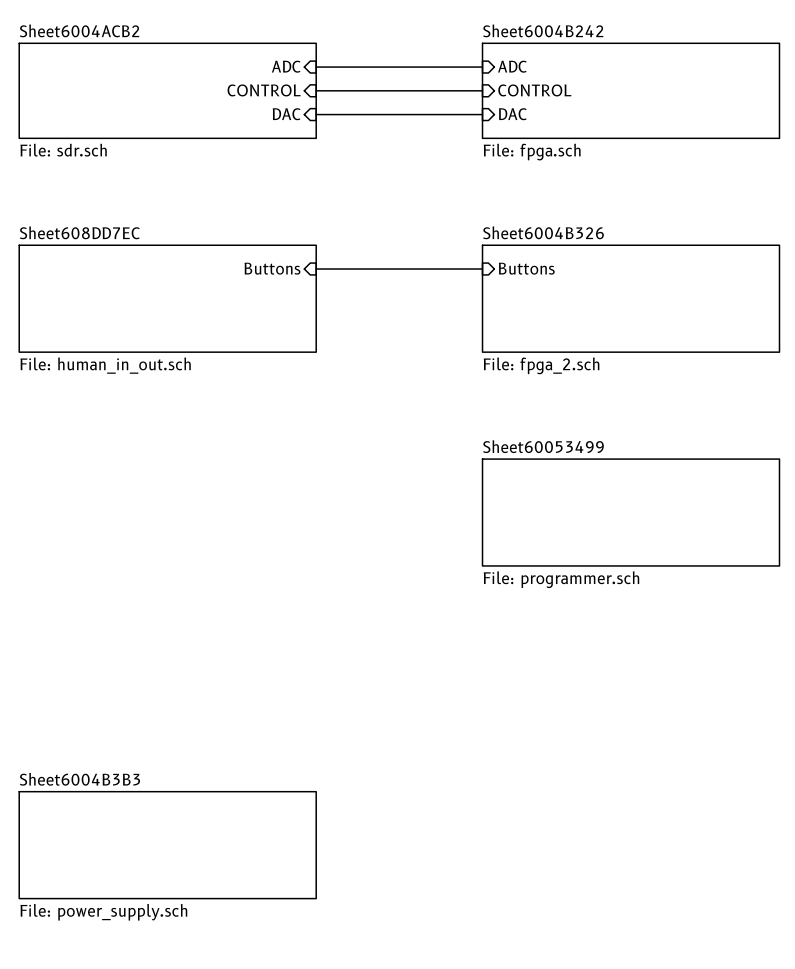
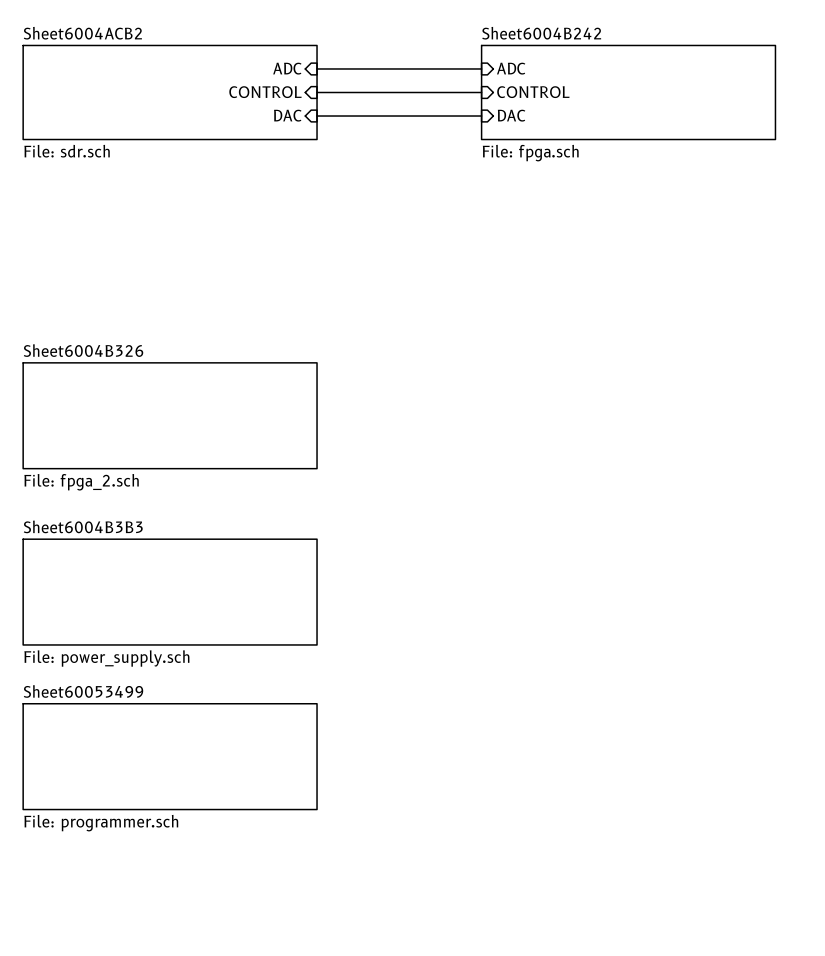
sheet pin: Buttons (272, 268) -> none
sheet pin: Buttons (526, 268) -> none
bus: (316, 269) (482, 269) -> none
sheet Sheet608DD7EC: File: human_in_out.sch (167, 298) -> none
sheet Sheet6004B326 position: (631, 298) -> (170, 415)
sheet Sheet60053499 position: (631, 512) -> (170, 756)
sheet Sheet6004B3B3 position: (167, 845) -> (170, 592)

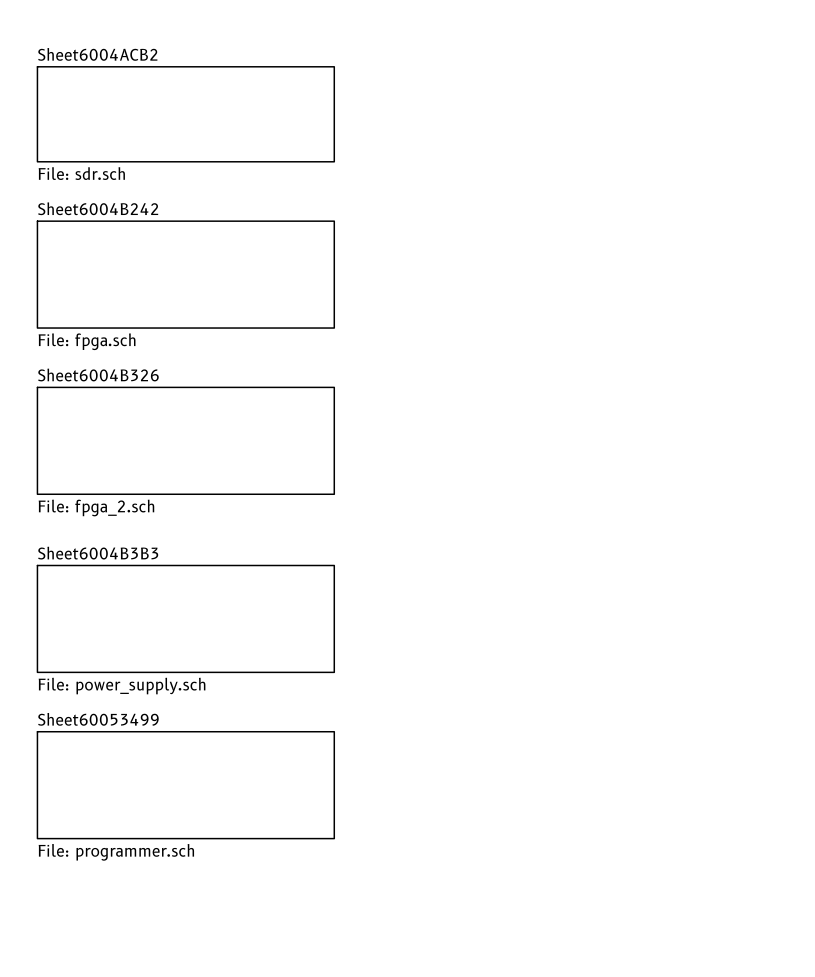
sheet Sheet6004B242 shape: [481, 45, 776, 140] -> [37, 221, 335, 329]
sheet pin: ADC (287, 68) -> none
wire: (317, 68) (481, 68) -> none
sheet pin: ADC (511, 68) -> none
sheet pin: CONTROL (265, 92) -> none
wire: (317, 92) (481, 92) -> none
sheet pin: CONTROL (533, 92) -> none
sheet pin: DAC (287, 115) -> none
sheet pin: DAC (511, 115) -> none
wire: (317, 116) (481, 116) -> none

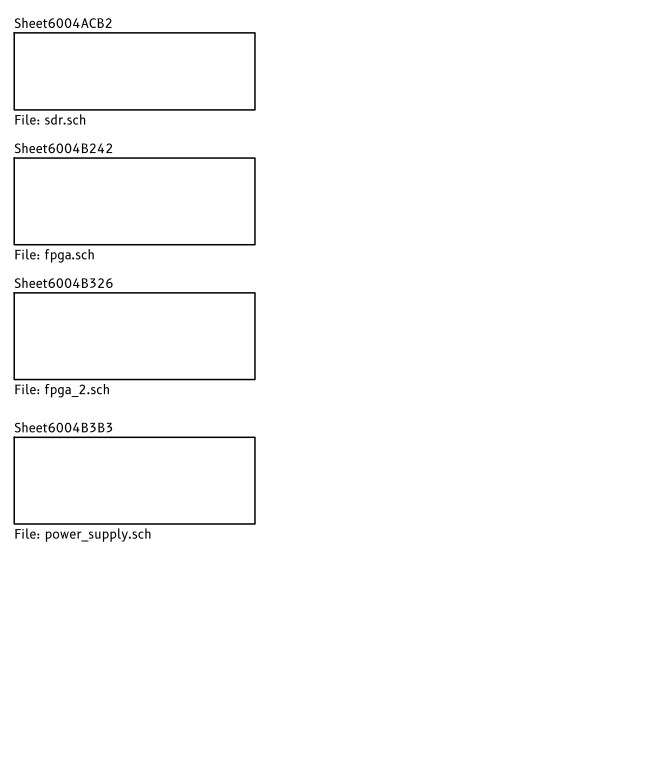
sheet Sheet60053499: File: programmer.sch (185, 785) -> none

